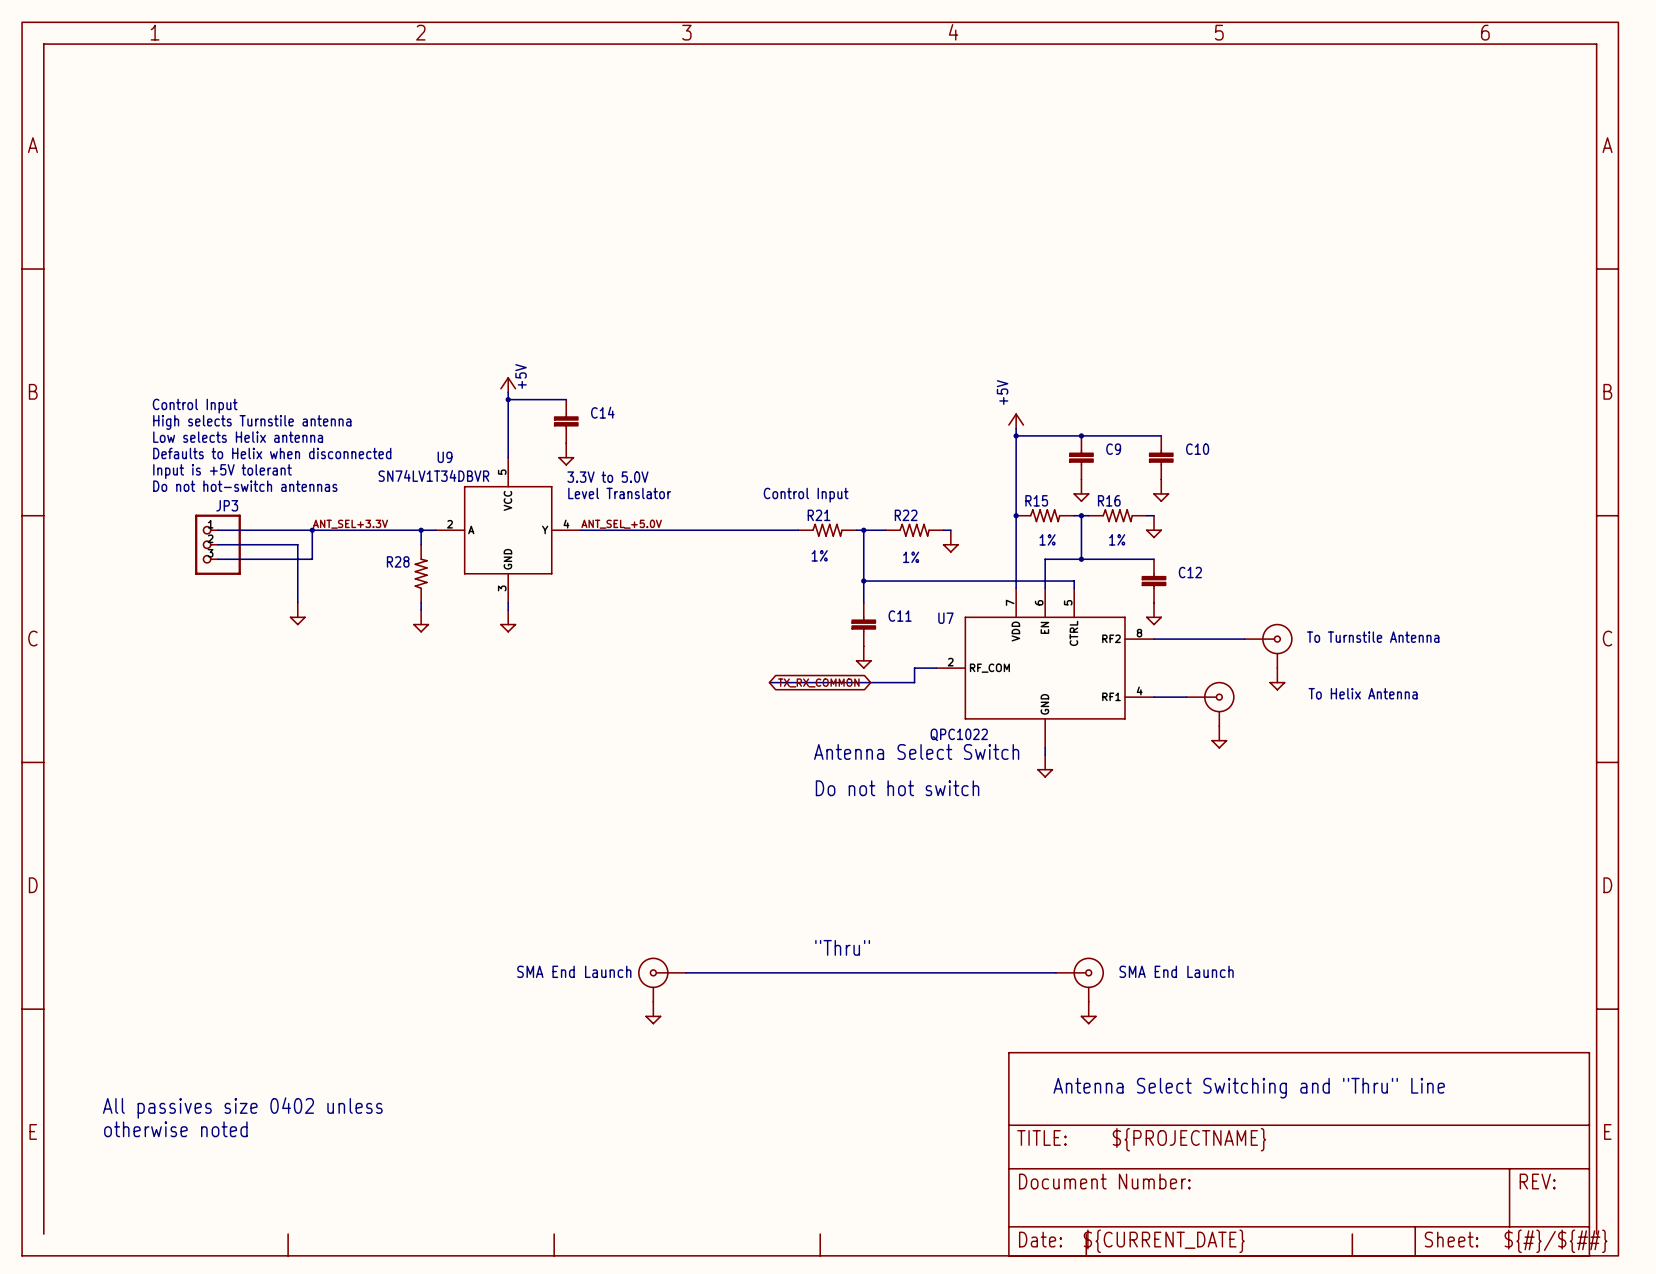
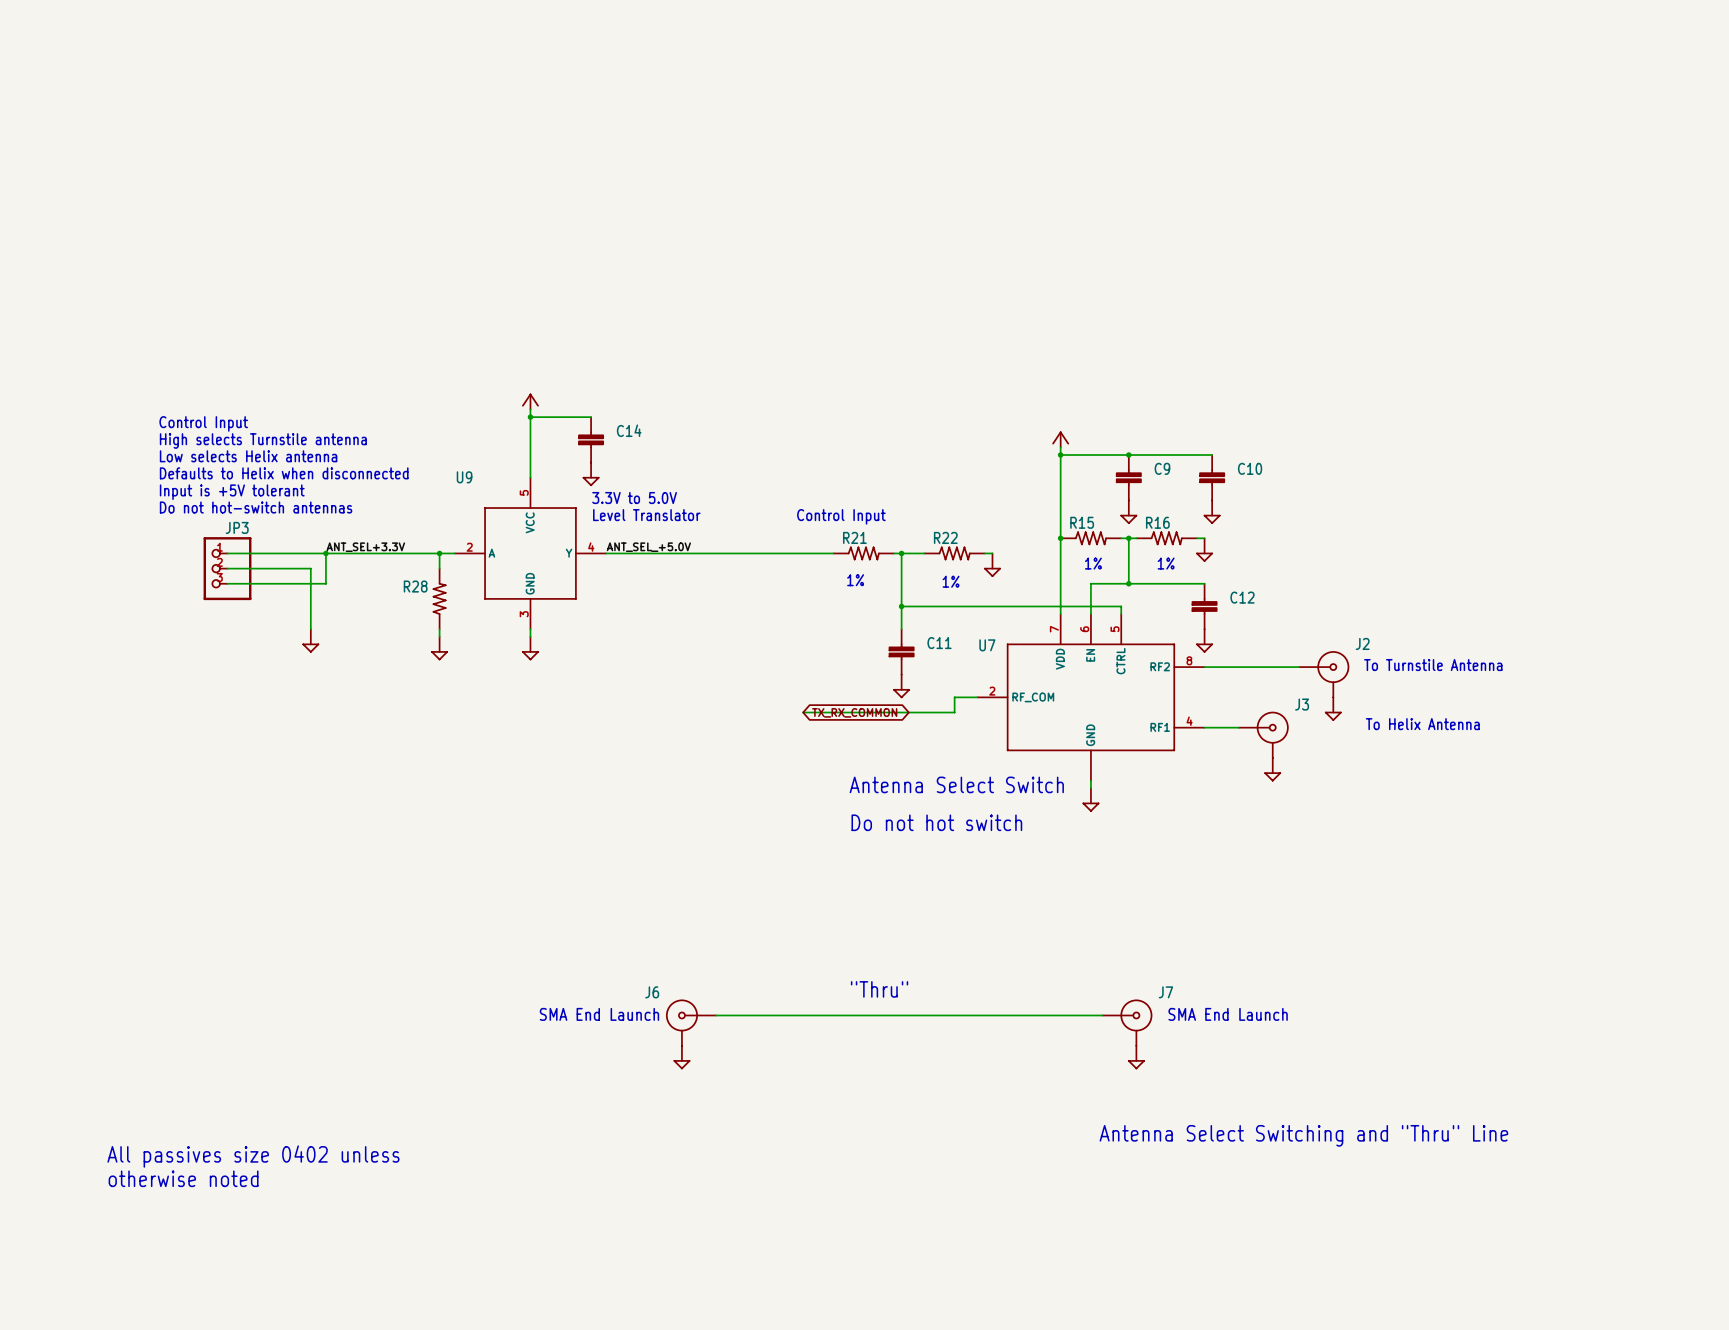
power symbol text: +5V (521, 376) -> none
power symbol text: +5V (1002, 392) -> none
U9 value: SN74LV1T34DBVR (433, 475) -> none
J2 name: none -> J2 (1362, 643)
power symbol: (820, 639) -> none
J3 name: none -> J3 (1302, 704)
U7 value: QPC1022 (959, 734) -> none
J6 name: none -> J6 (652, 992)
J7 name: none -> J7 (1165, 992)
power symbol: (1299, 1154) -> none

